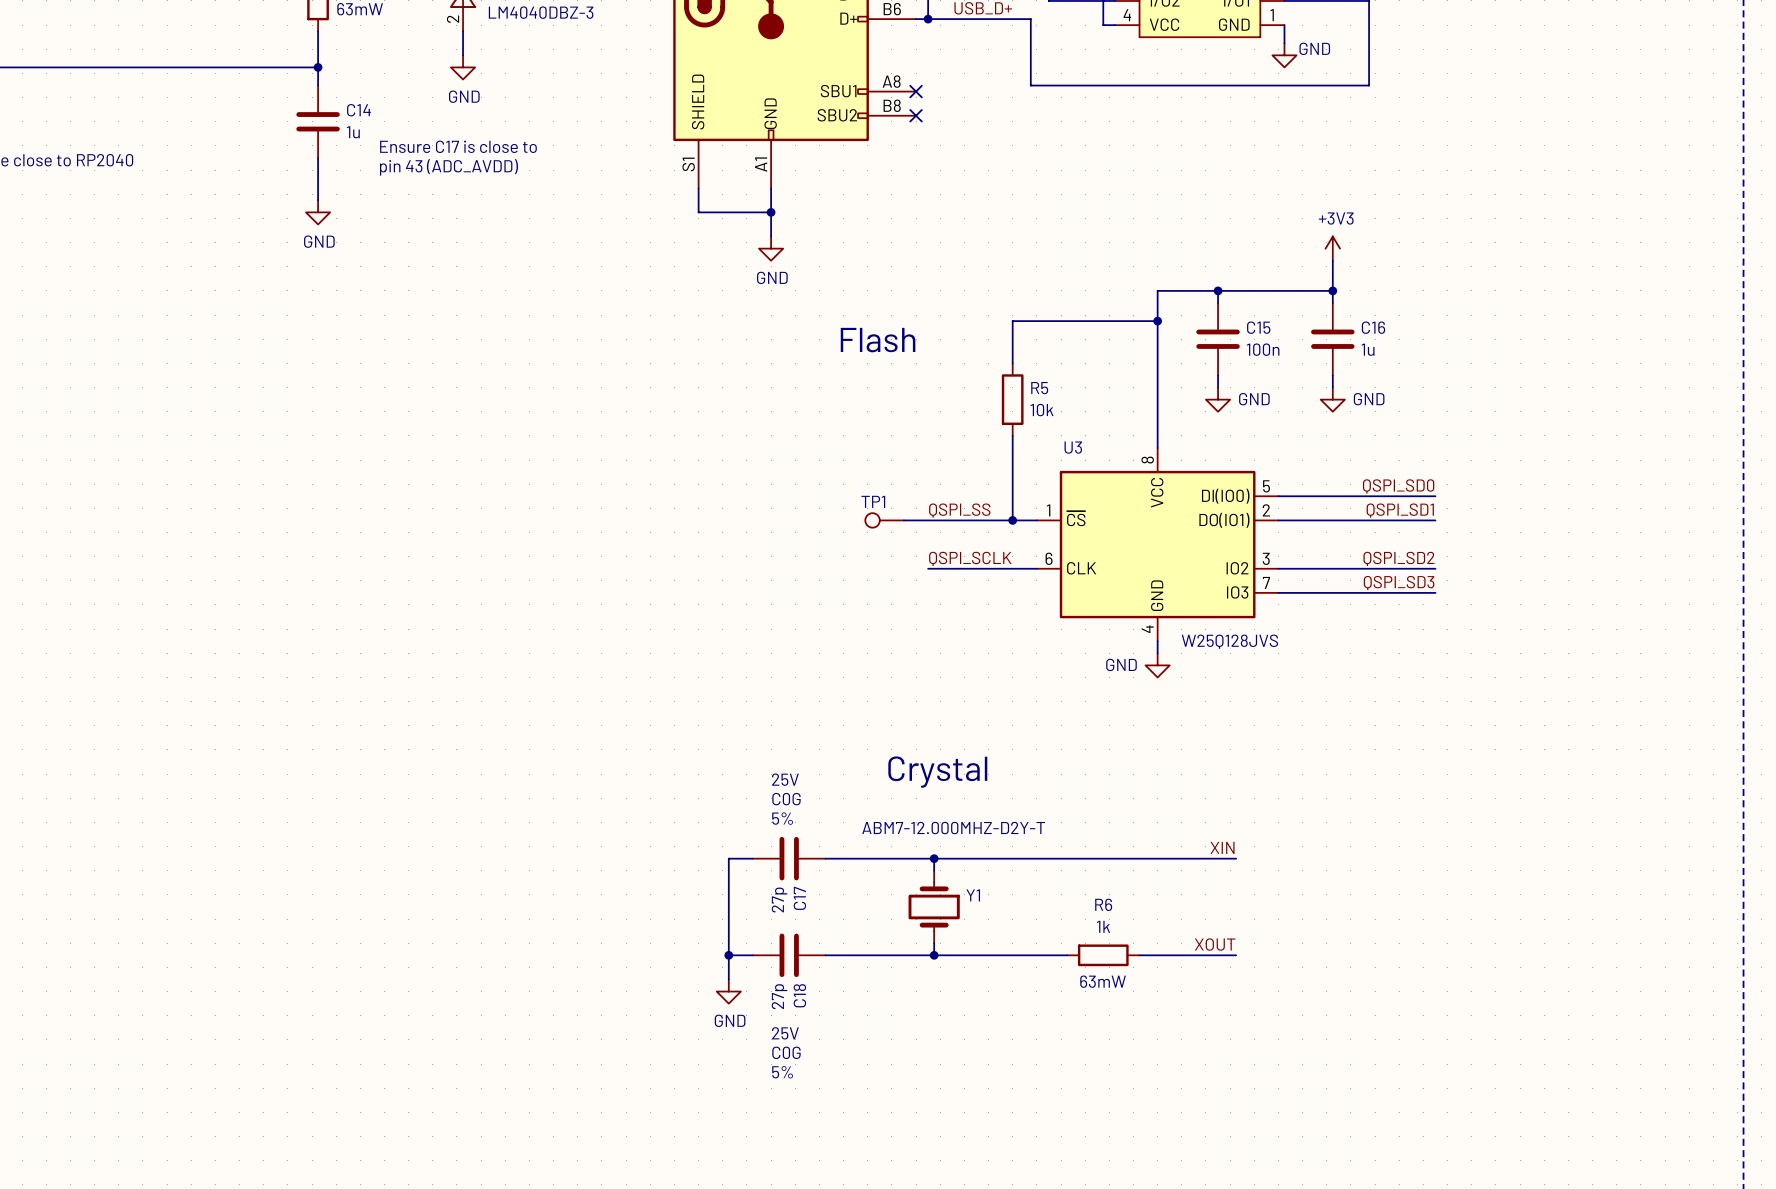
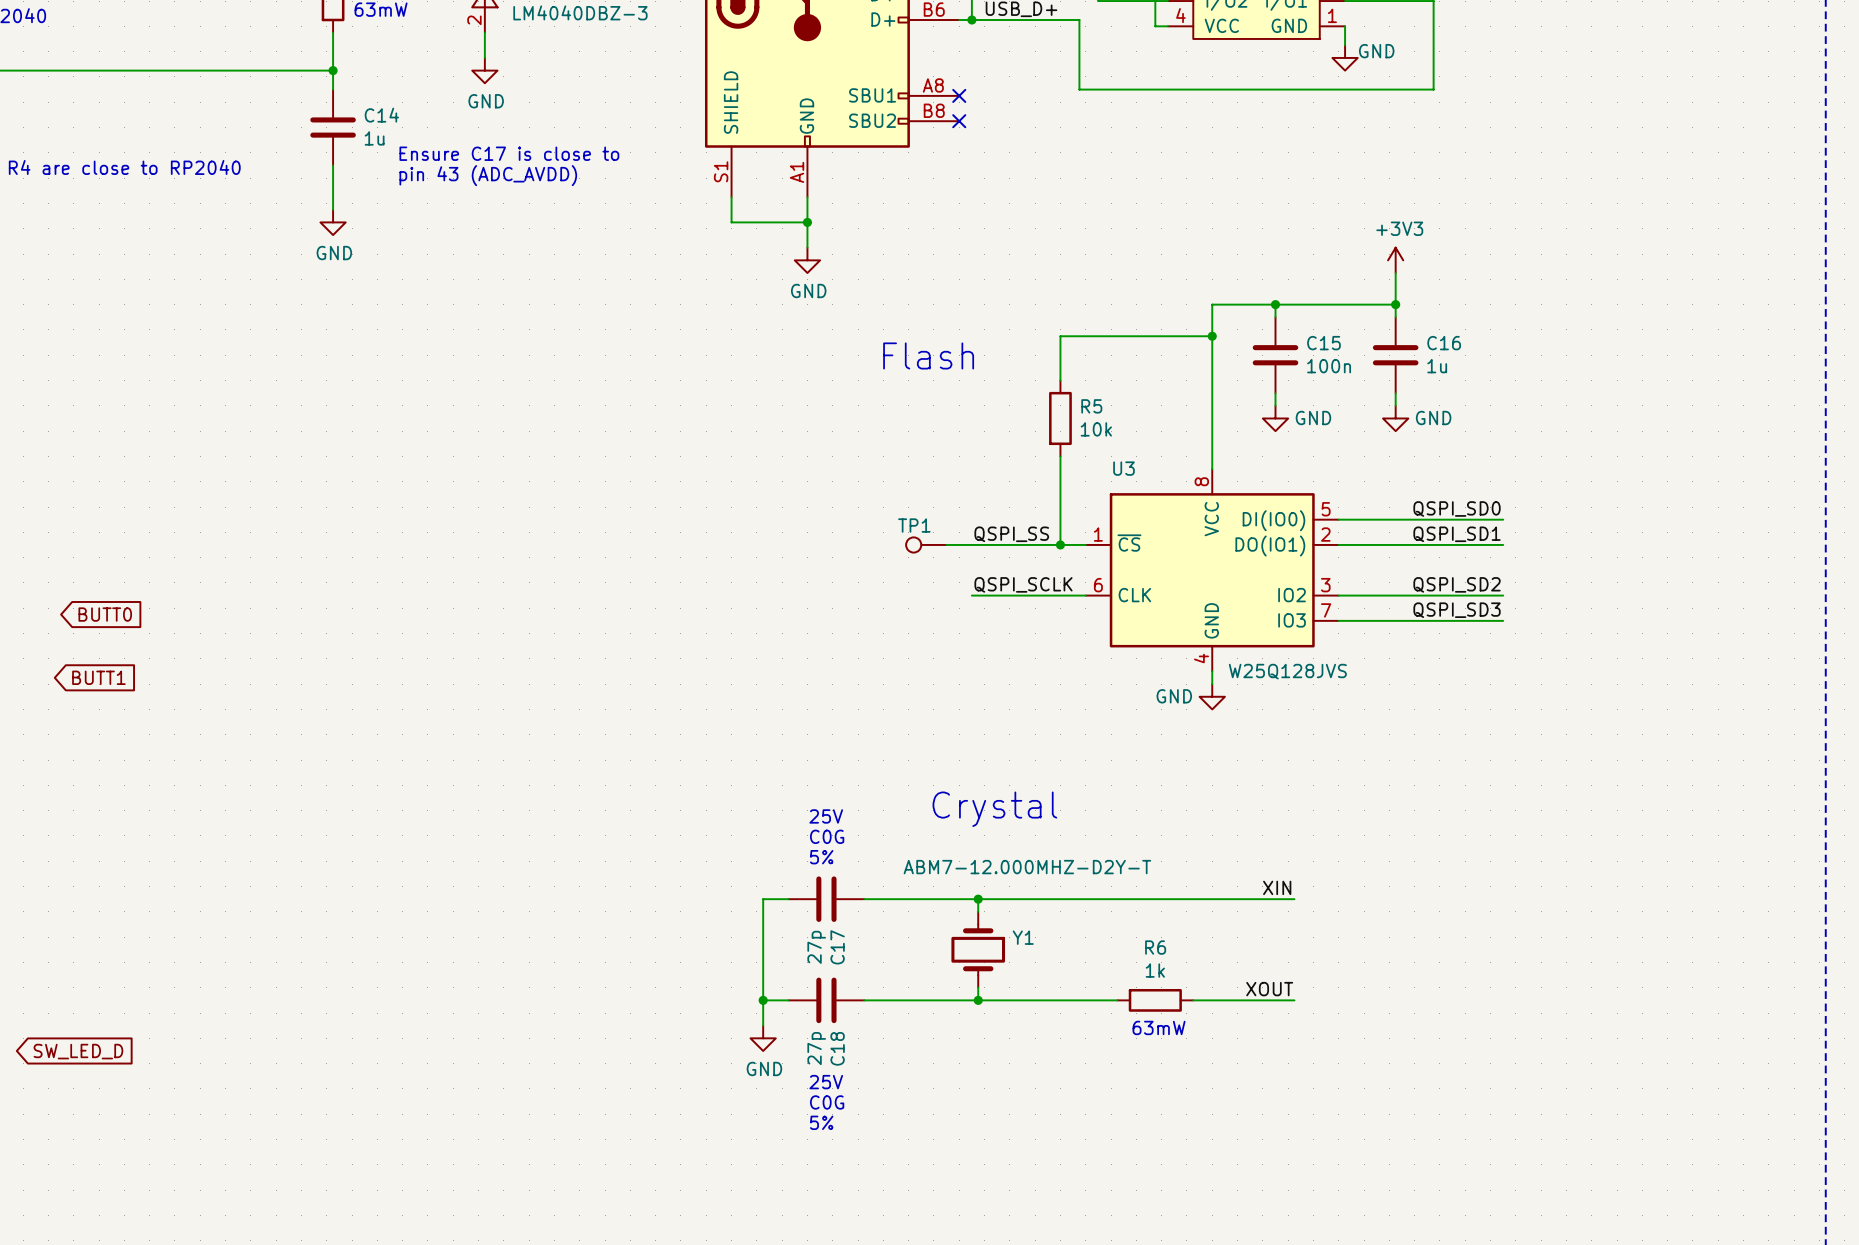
global label: none -> BUTT0 (105, 614)
global label: none -> BUTT1 (98, 677)
global label: none -> SW_LED_D (78, 1051)

